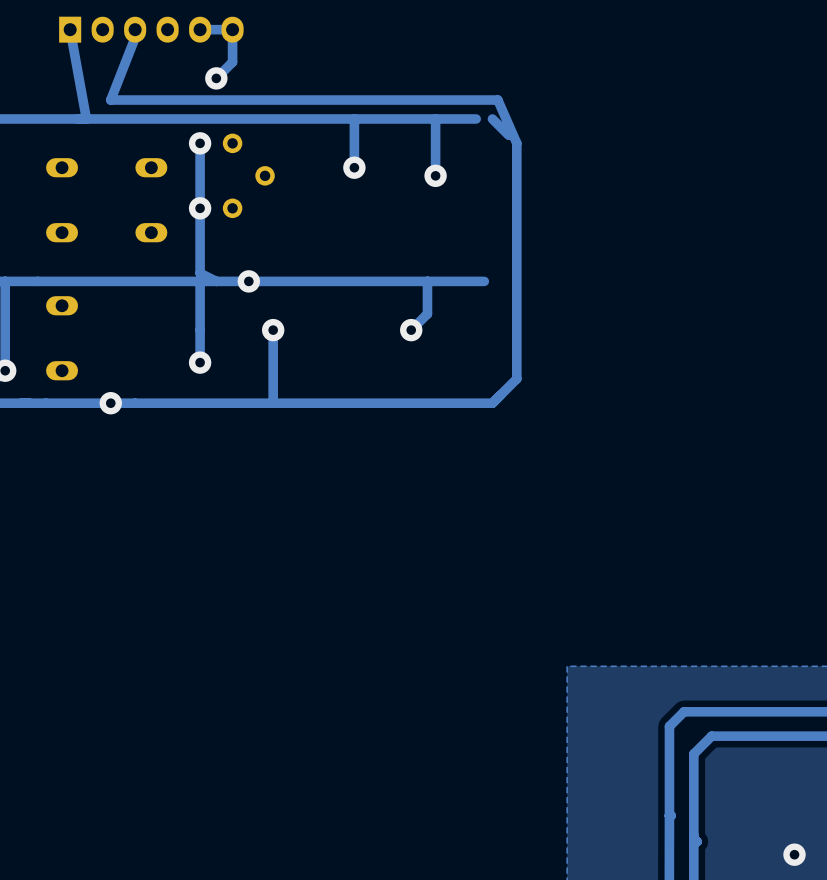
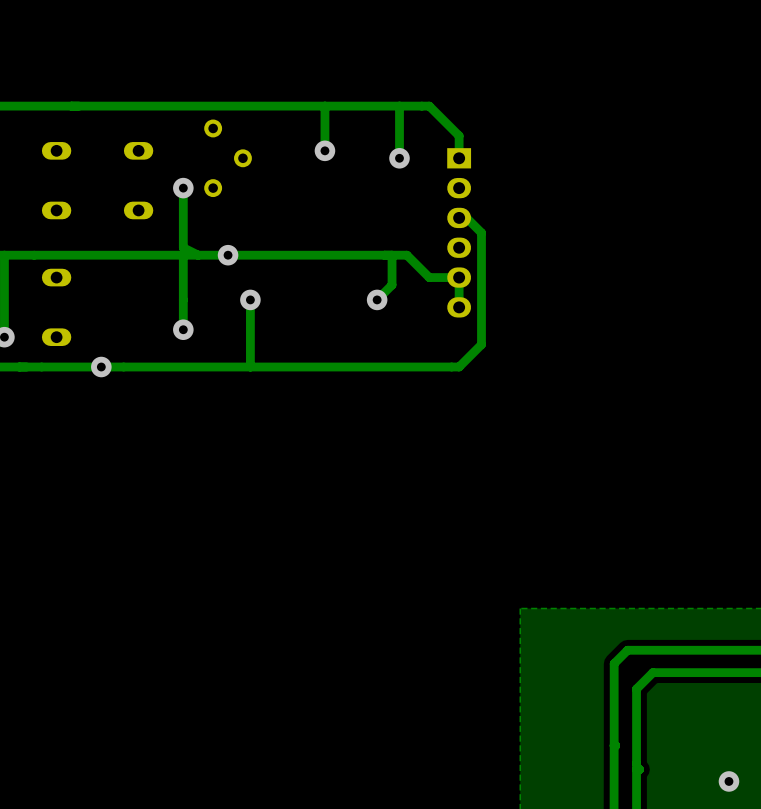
track: (70, 29) (86, 118) -> none
track: (135, 29) (135, 37) (110, 100) (497, 100) (516, 143) (516, 378) (492, 403) -> (459, 217) (466, 217) (481, 232) (481, 344) (459, 367) (451, 367)
part: (151, 29) -> none
track: (200, 29) (232, 29) (232, 62) (216, 78) -> none
via: (216, 78) -> none
track: (476, 118) (468, 118) -> (459, 158) (459, 135) (429, 106)
track: (492, 118) (508, 135) -> none
track: (200, 143) (200, 208) -> none
via: (200, 143) -> none
part: none -> (459, 232)
track: (484, 281) (443, 281) -> (459, 307) (459, 277) (429, 277) (406, 255)

